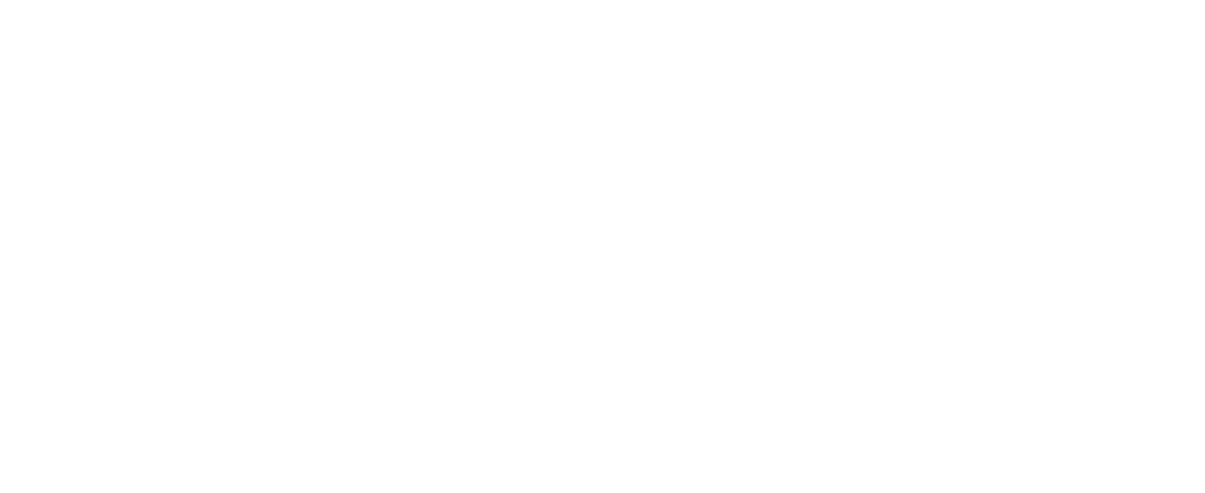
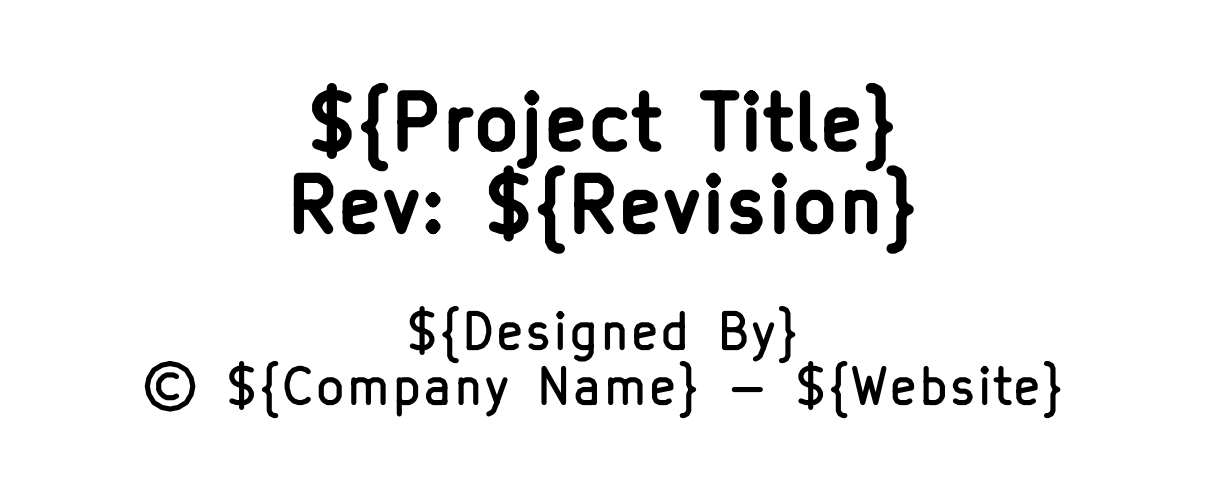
text: none -> ${Project Title} (602, 127)
text: none -> Rev: ${Revision} (603, 209)
text: none -> ${Designed By} (602, 334)
text: none -> © ${Company Name} - ${Website} (602, 389)

